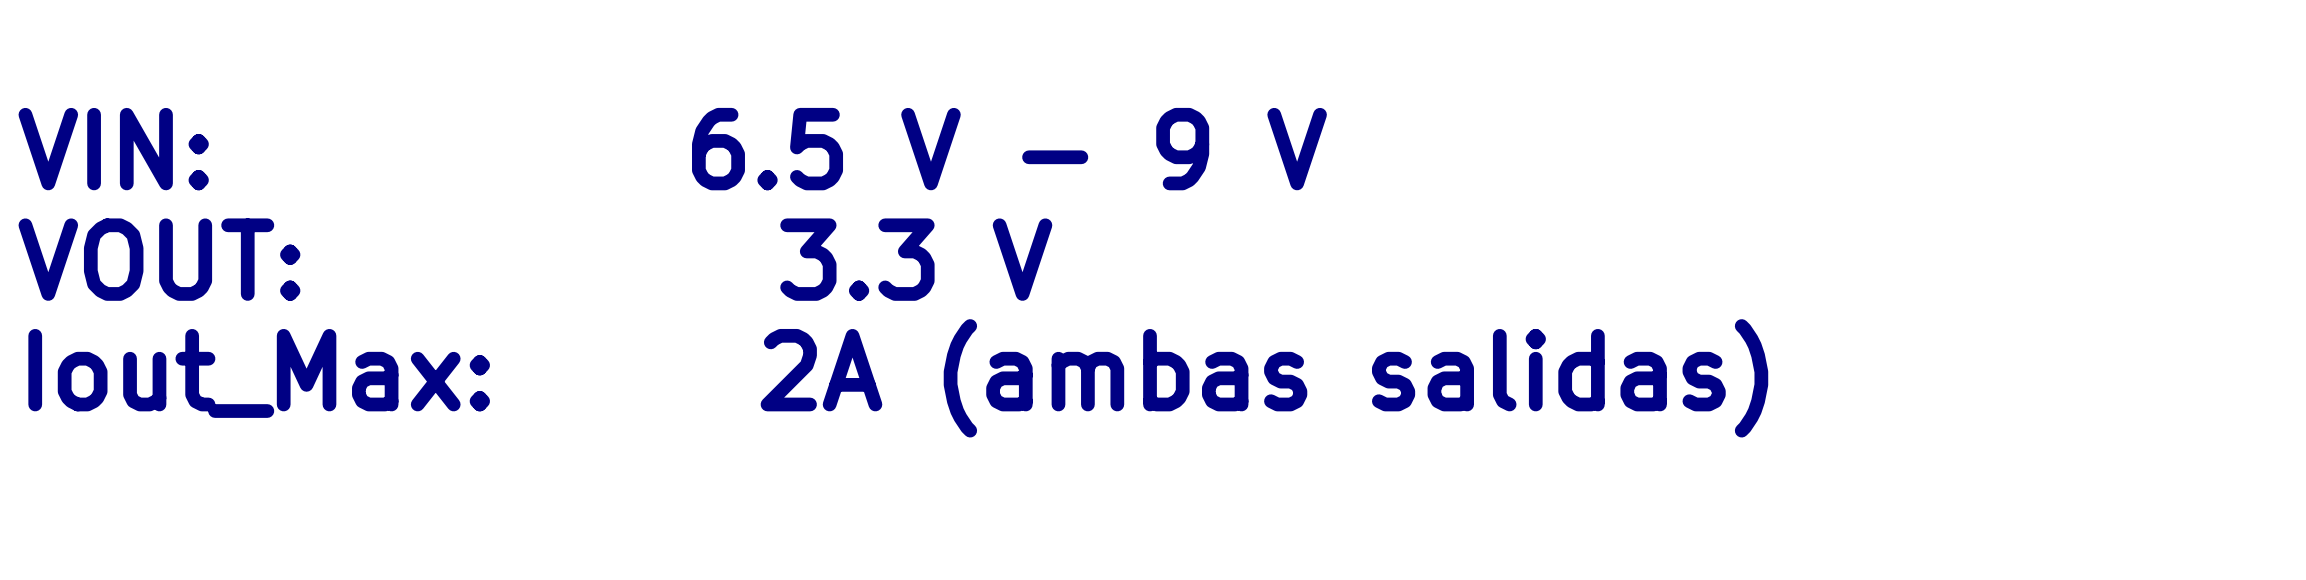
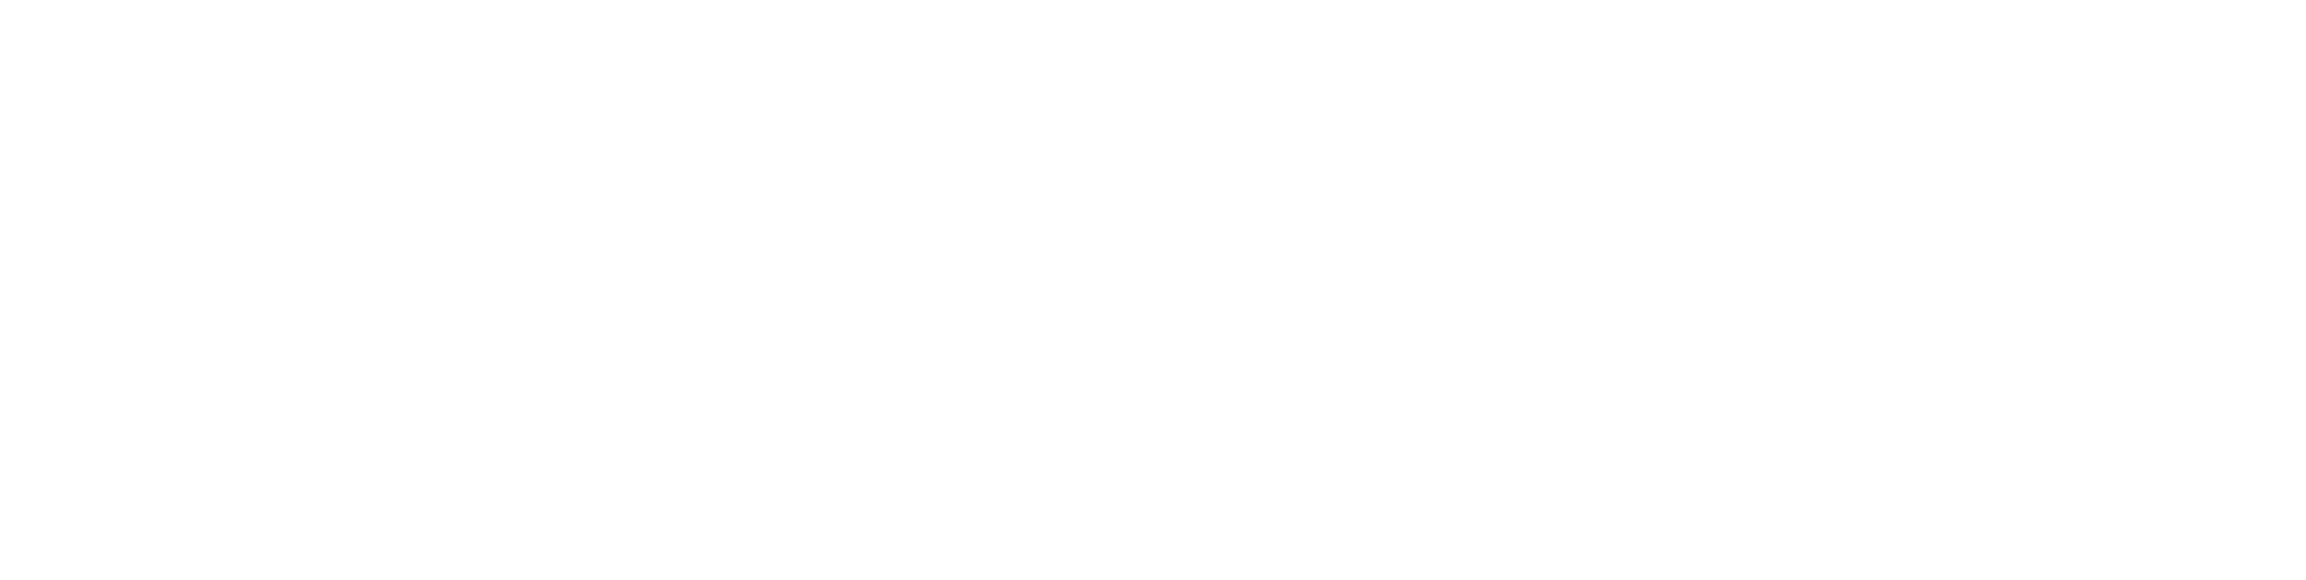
text: VIN: 6.5 V - 9 V (672, 149) -> none
text: VOUT: 3.3 V (535, 259) -> none
text: Iout_Max: 2A (ambas salidas) (898, 378) -> none

